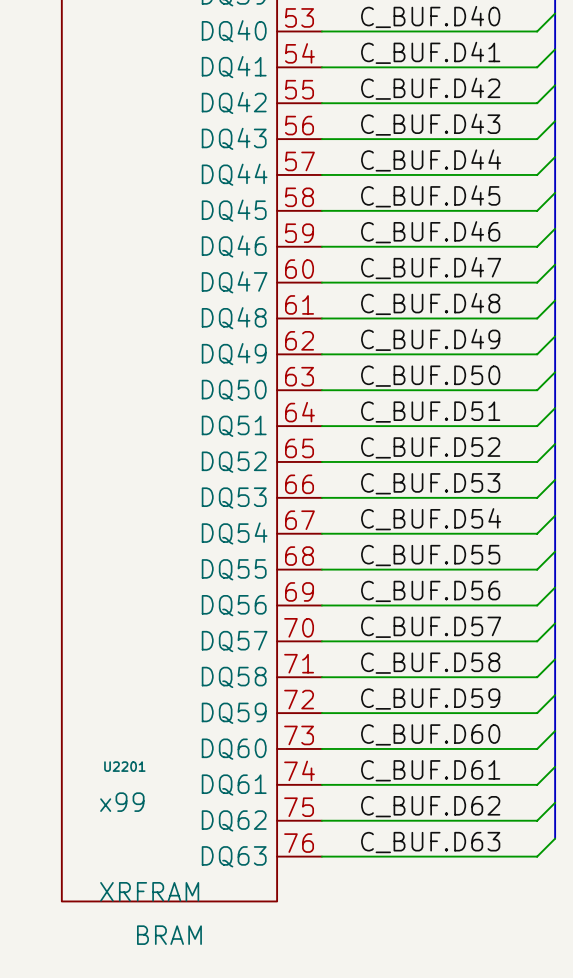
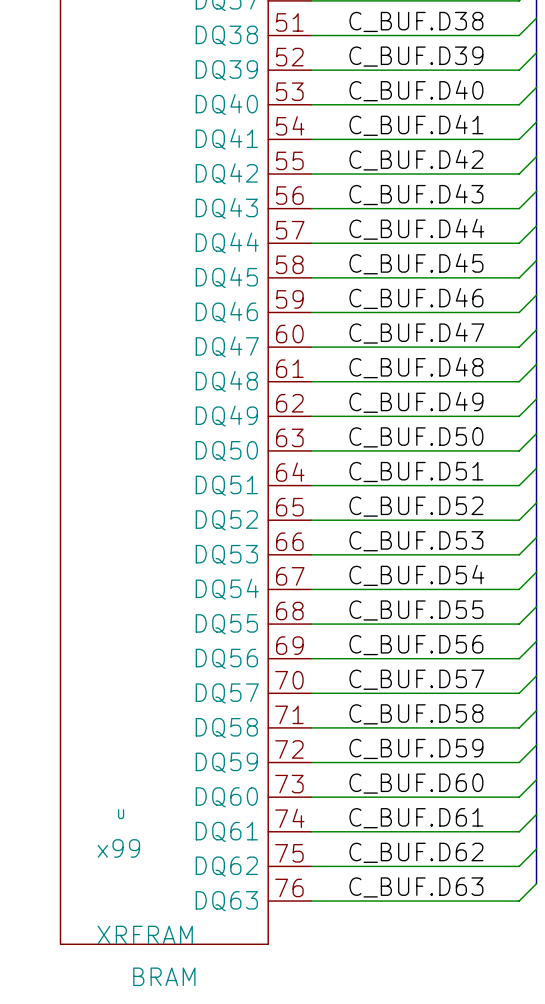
U2201 name: U2201 (124, 766) -> U (121, 814)

